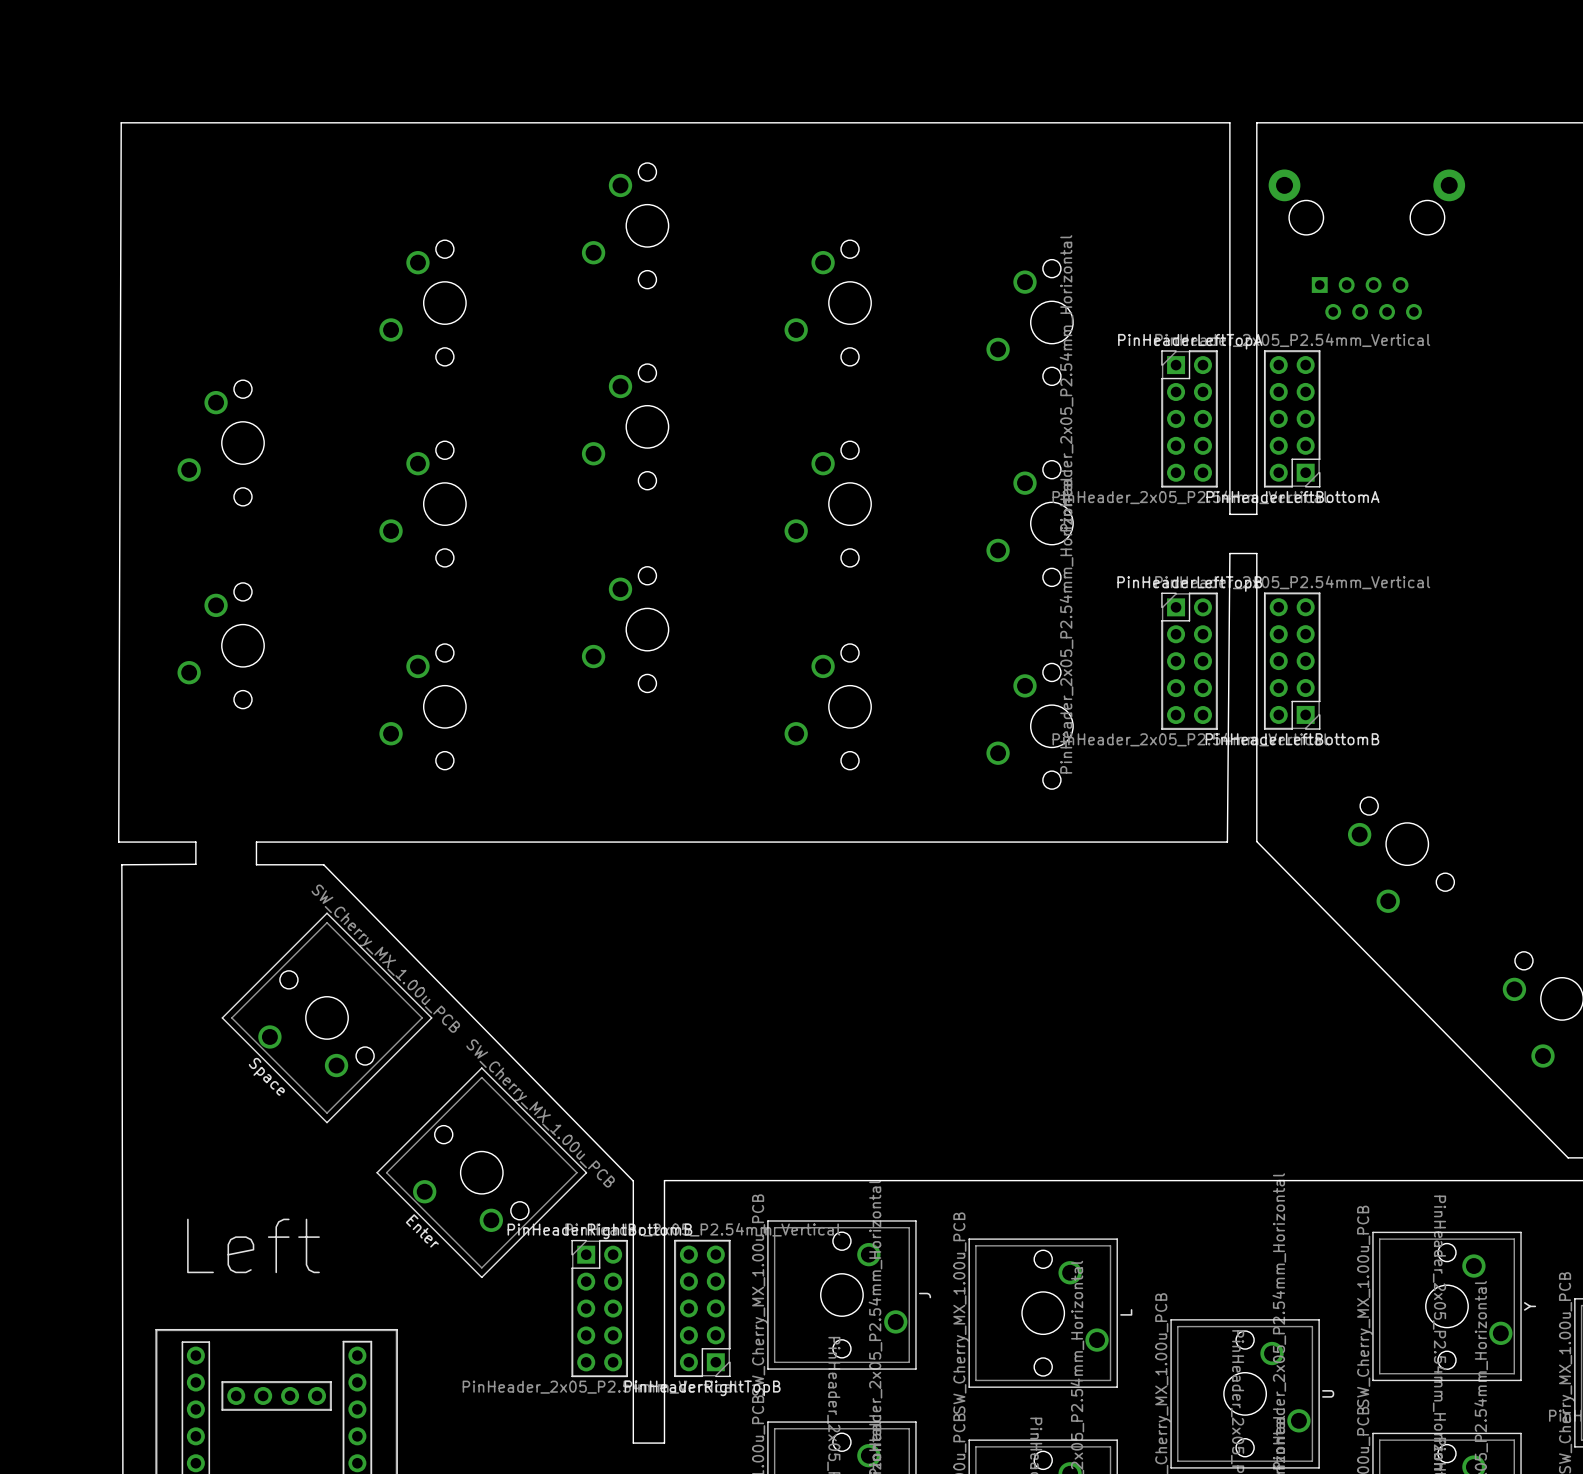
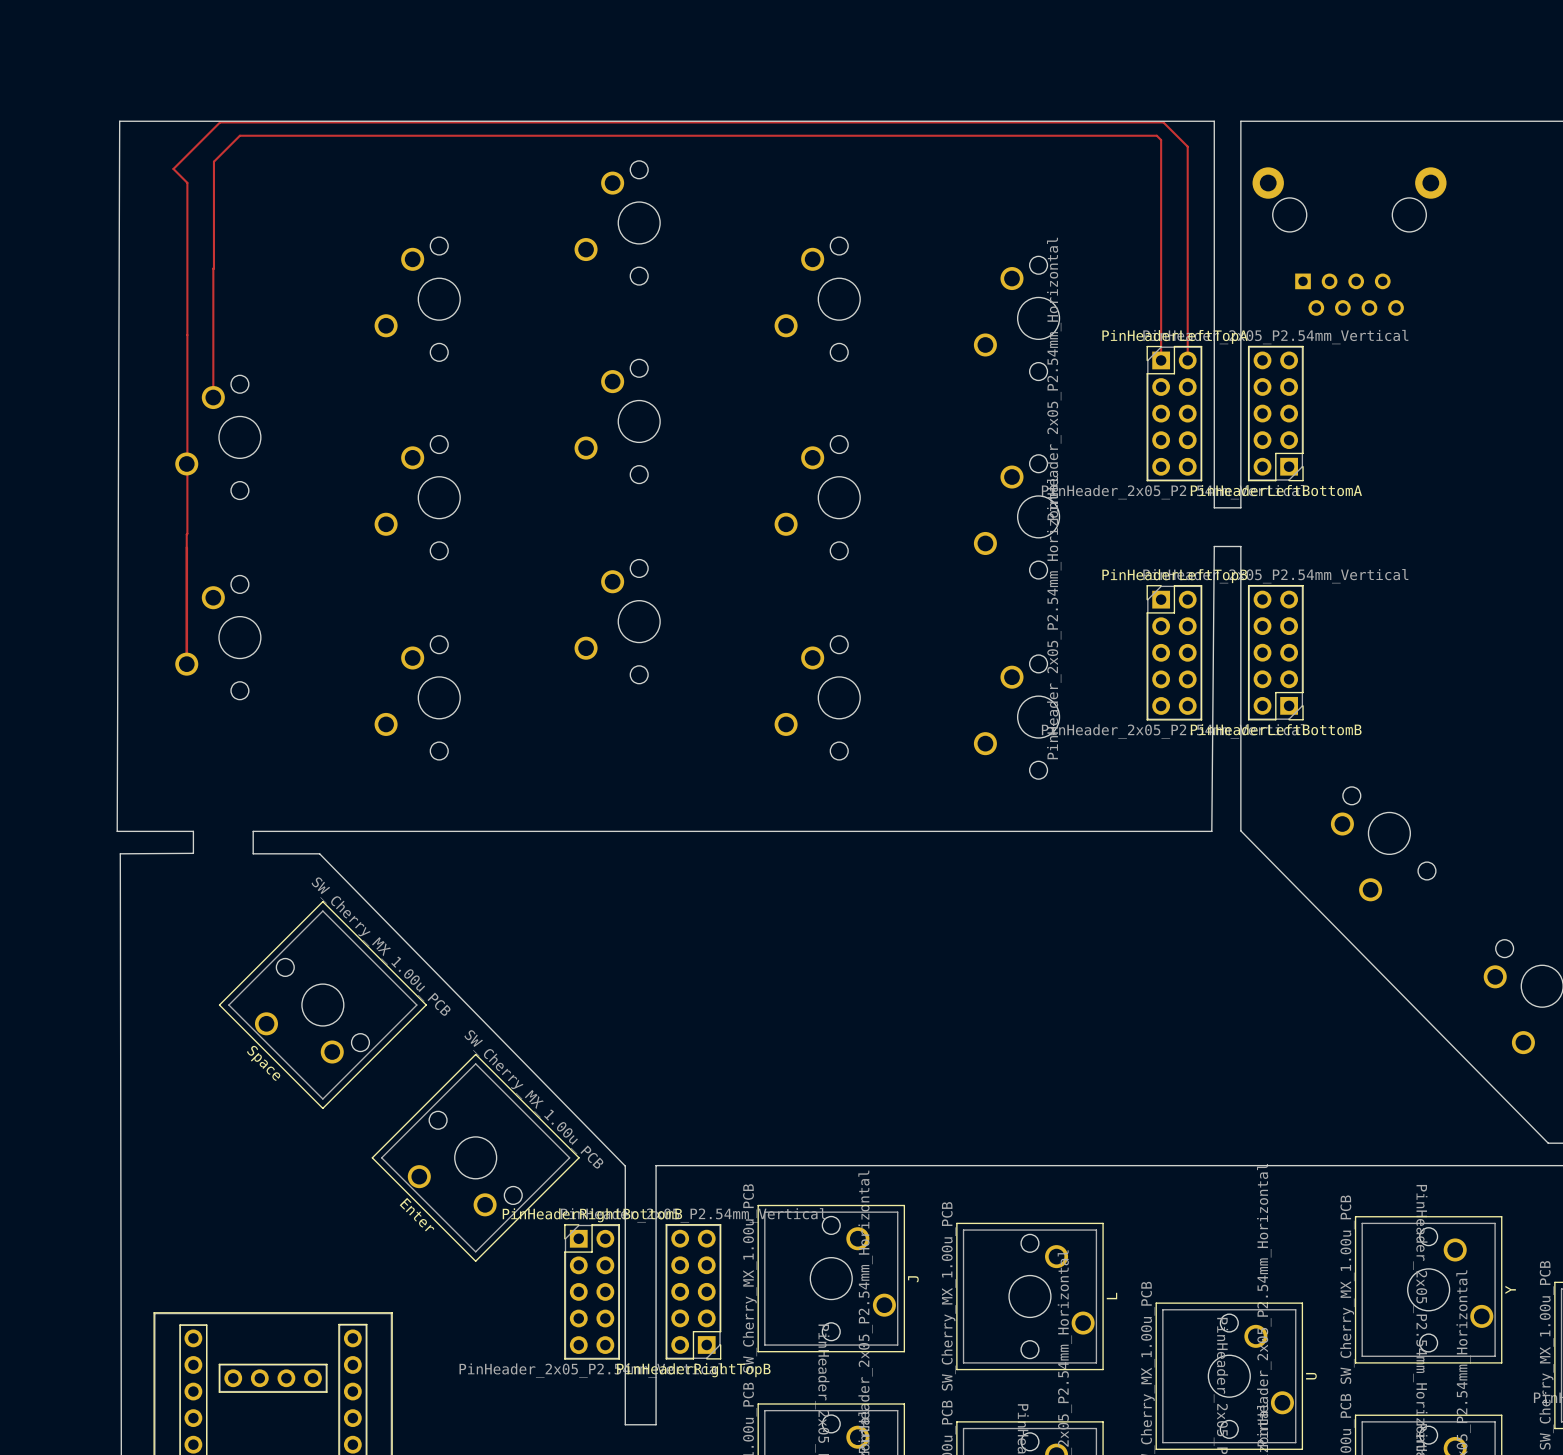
top track: none -> (213, 268) (213, 161) (239, 135) (1156, 135) (1161, 140) (1161, 360)
top track: none -> (213, 268) (213, 397)
top track: none -> (1187, 360) (1187, 146) (1163, 122) (219, 122) (173, 168) (187, 182) (186, 664)
text: Left (253, 1245) -> none

